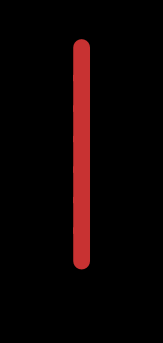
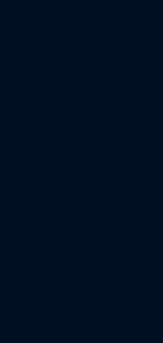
top track: (81, 47) (81, 261) -> none

